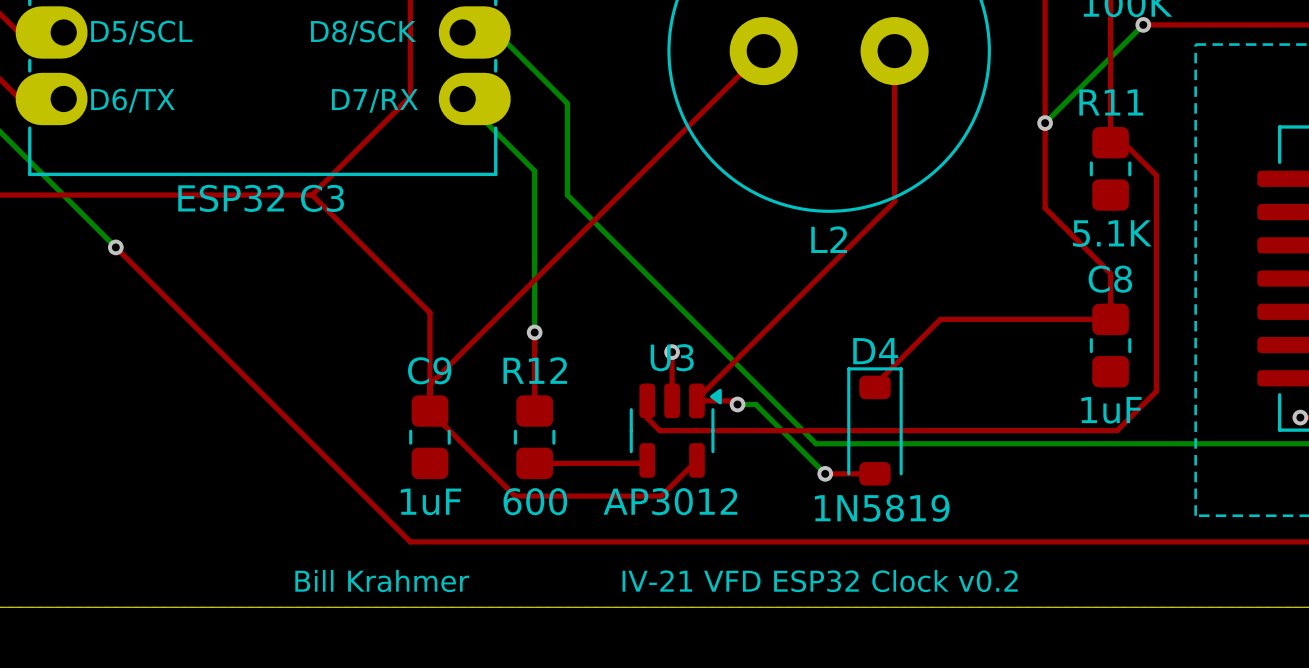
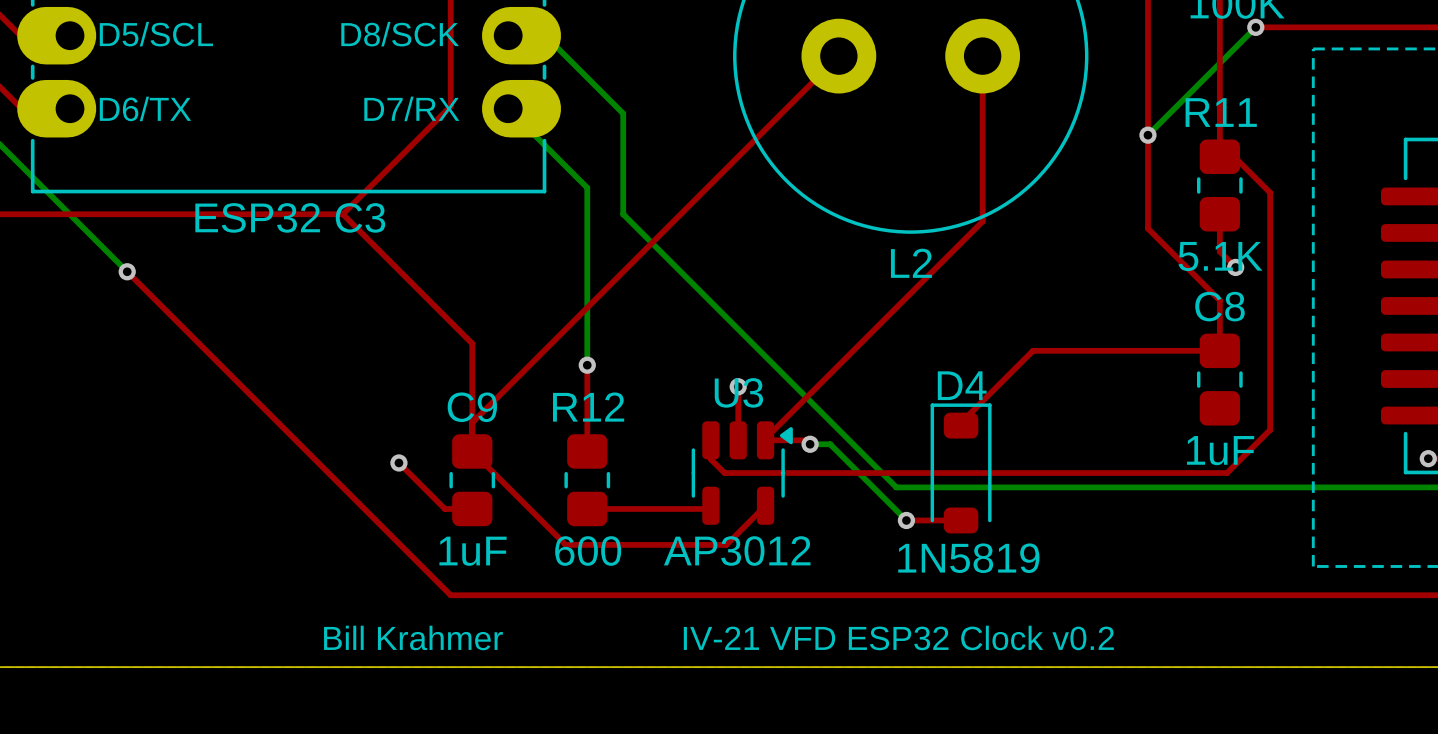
top track: none -> (1219, 214) (1219, 251) (1235, 267)
via: none -> (1235, 267)
top track: none -> (398, 462) (444, 508) (472, 508)
via: none -> (398, 462)

